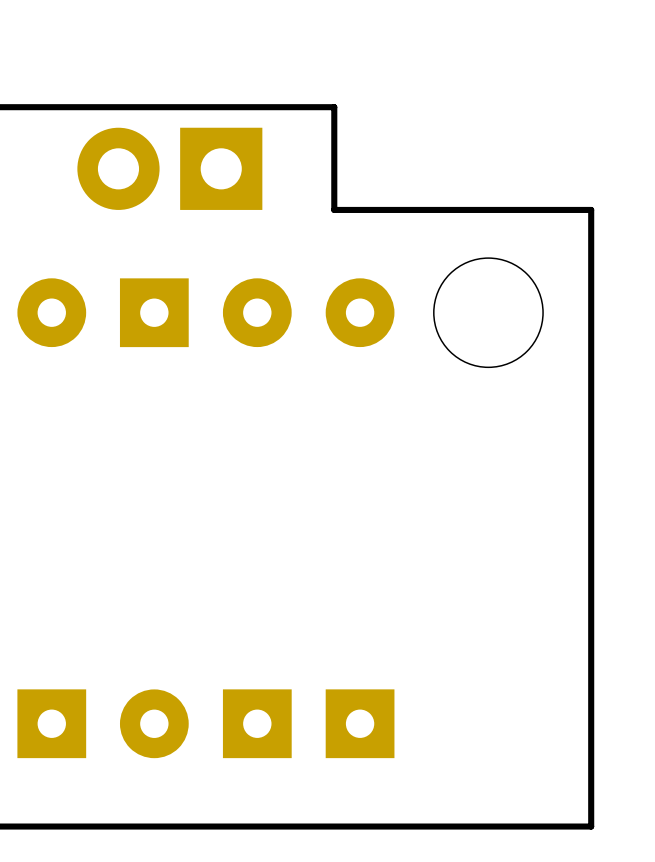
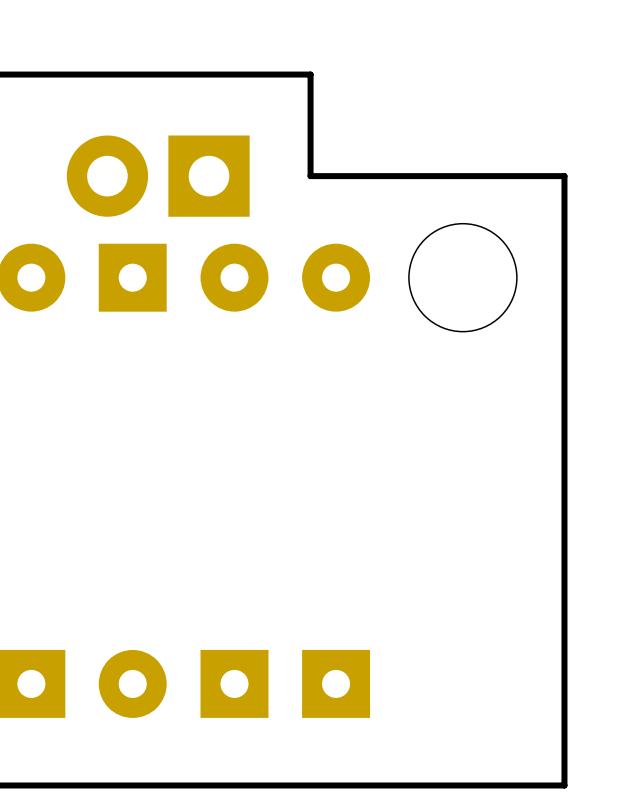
part position: (169, 168) -> (158, 176)

